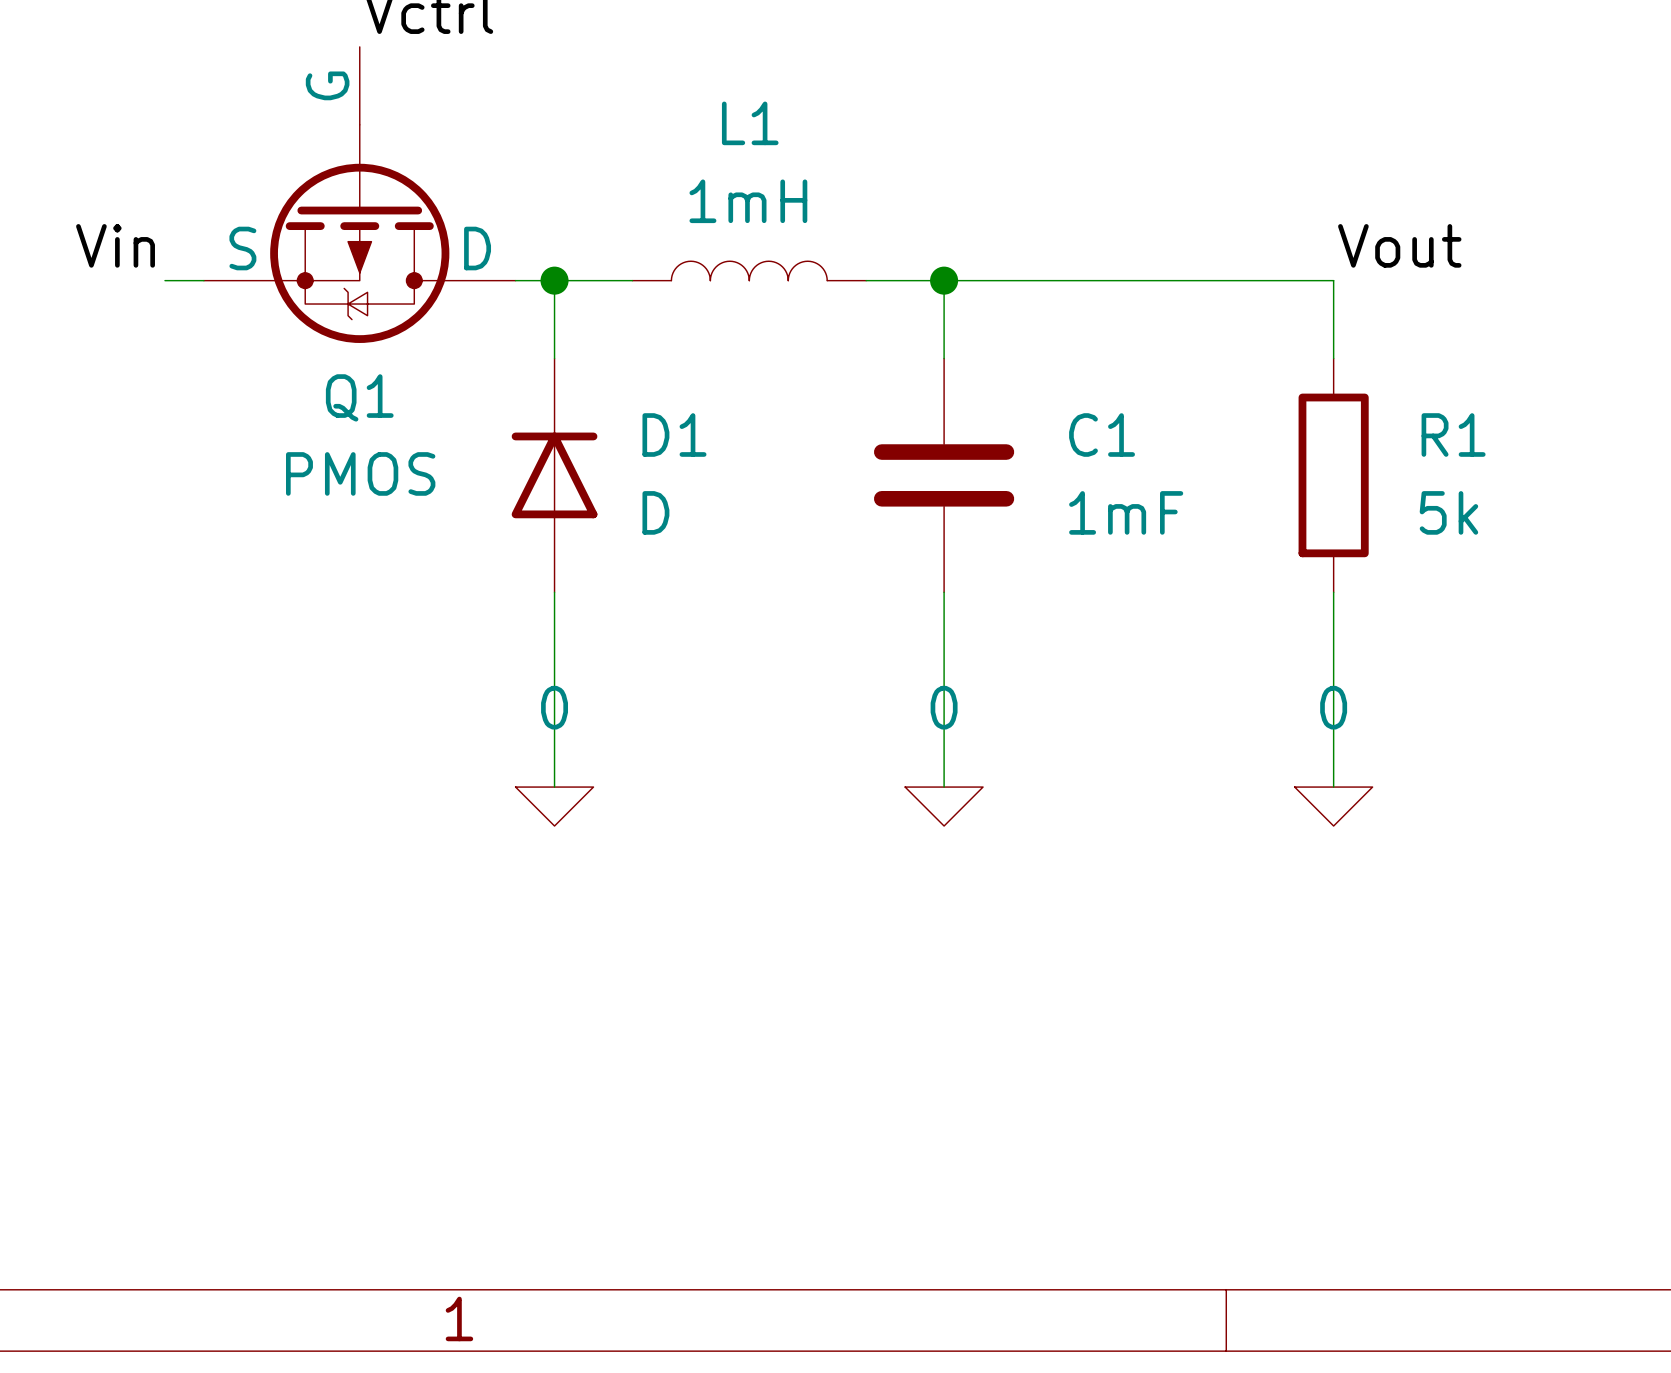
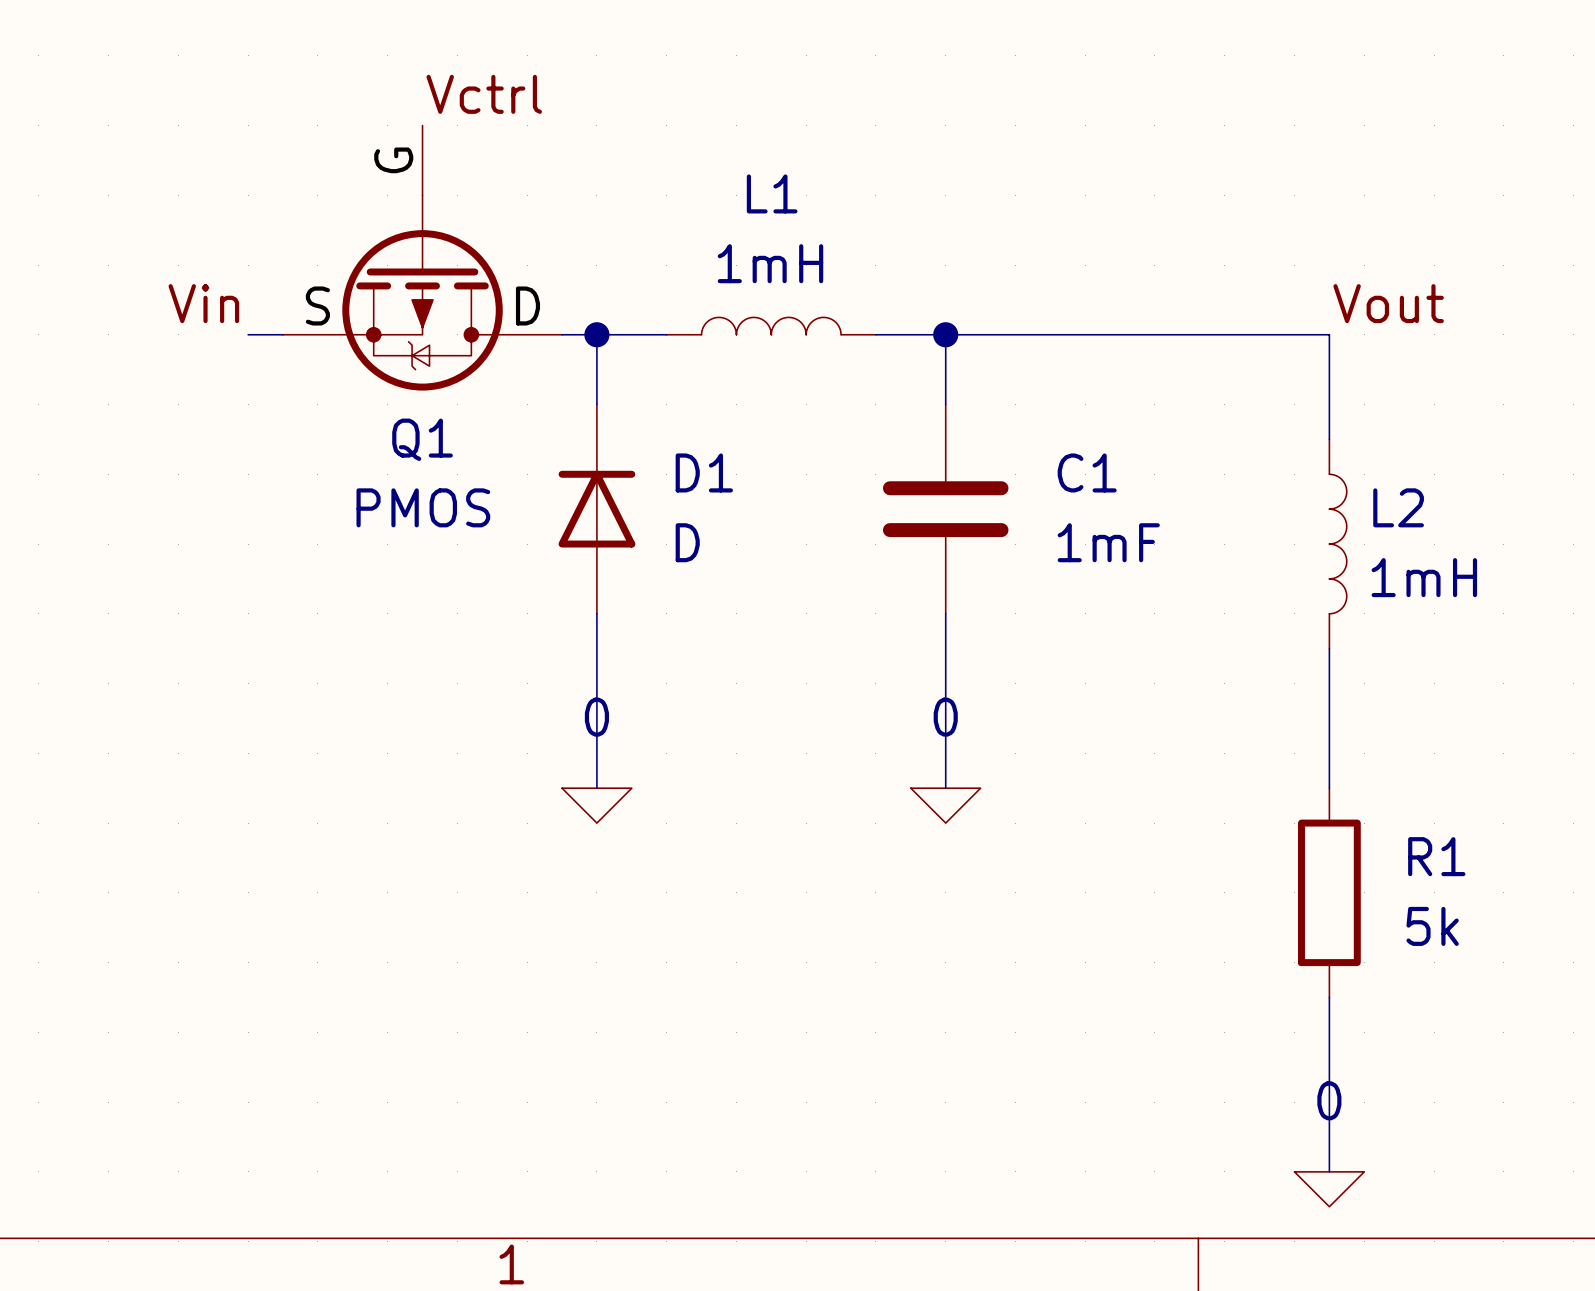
label position: Vout (1399, 245) -> Vout (1388, 303)
wire: (1333, 280) (1333, 358) -> (1294, 334) (1329, 334) (1329, 439)
R1 position: (1333, 475) -> (1329, 892)
L2: none -> 1mH (1338, 544)
wire: (1333, 592) (1333, 787) -> (1329, 997) (1329, 1171)
wire: none -> (1329, 648) (1329, 788)
power symbol position: 0 (1333, 806) -> 0 (1329, 1189)

